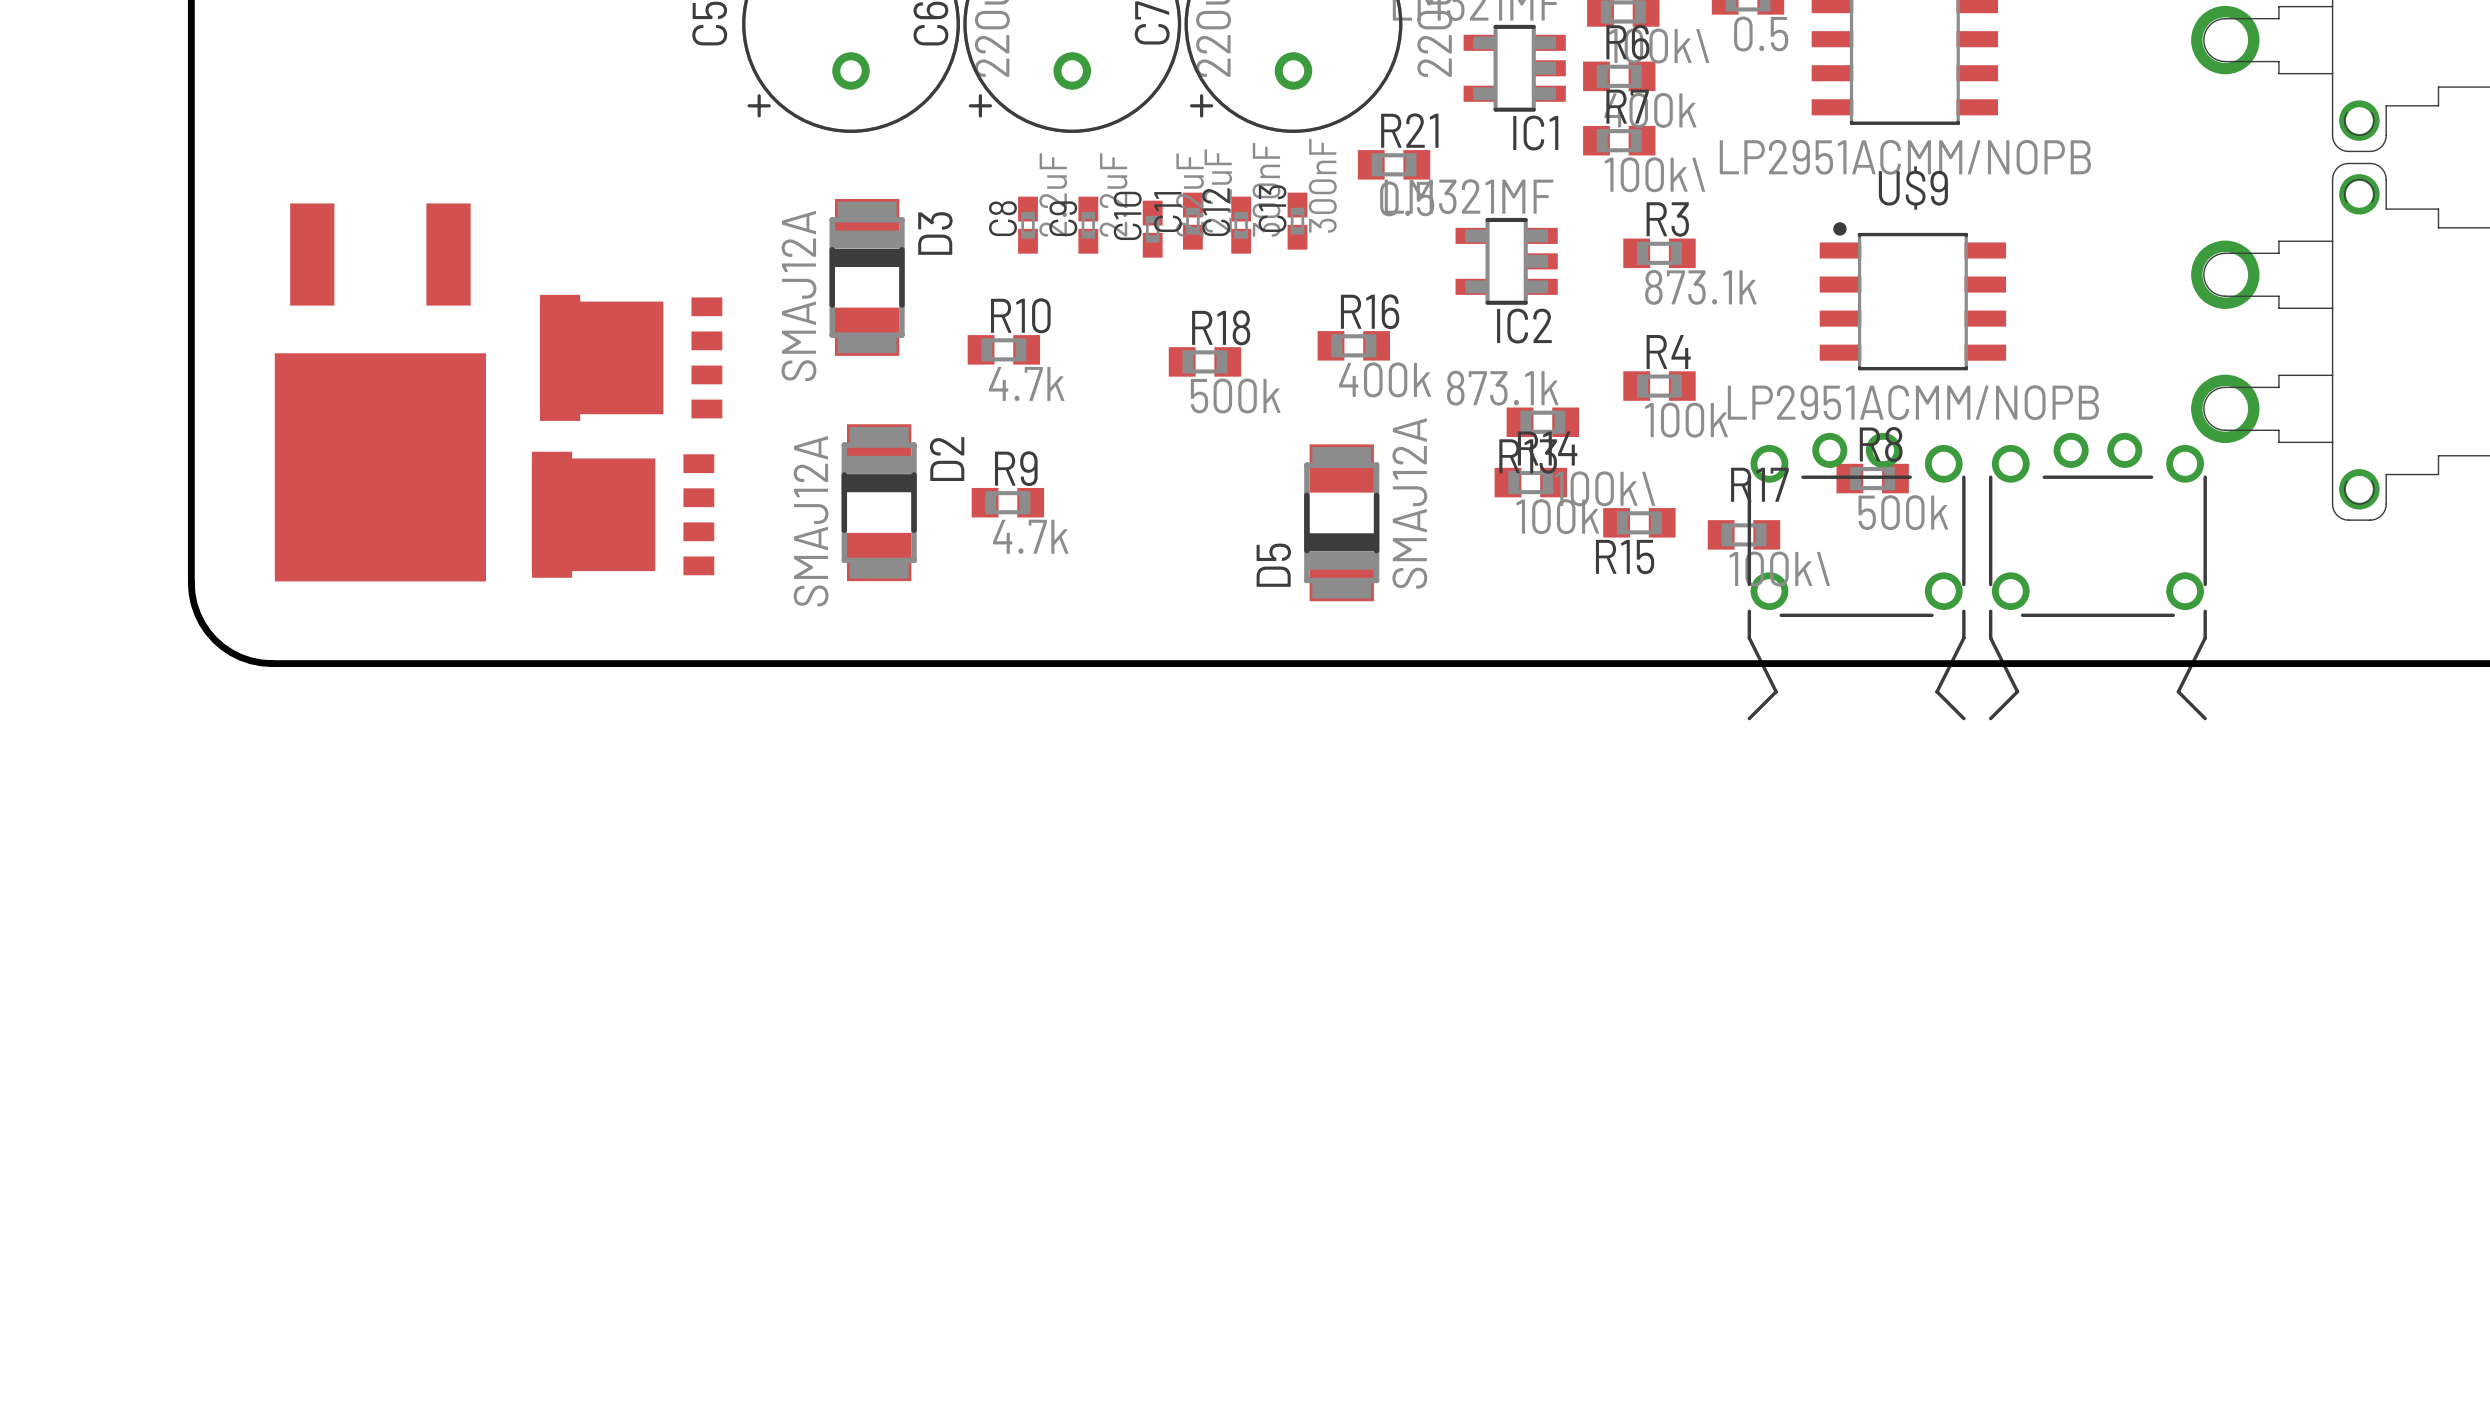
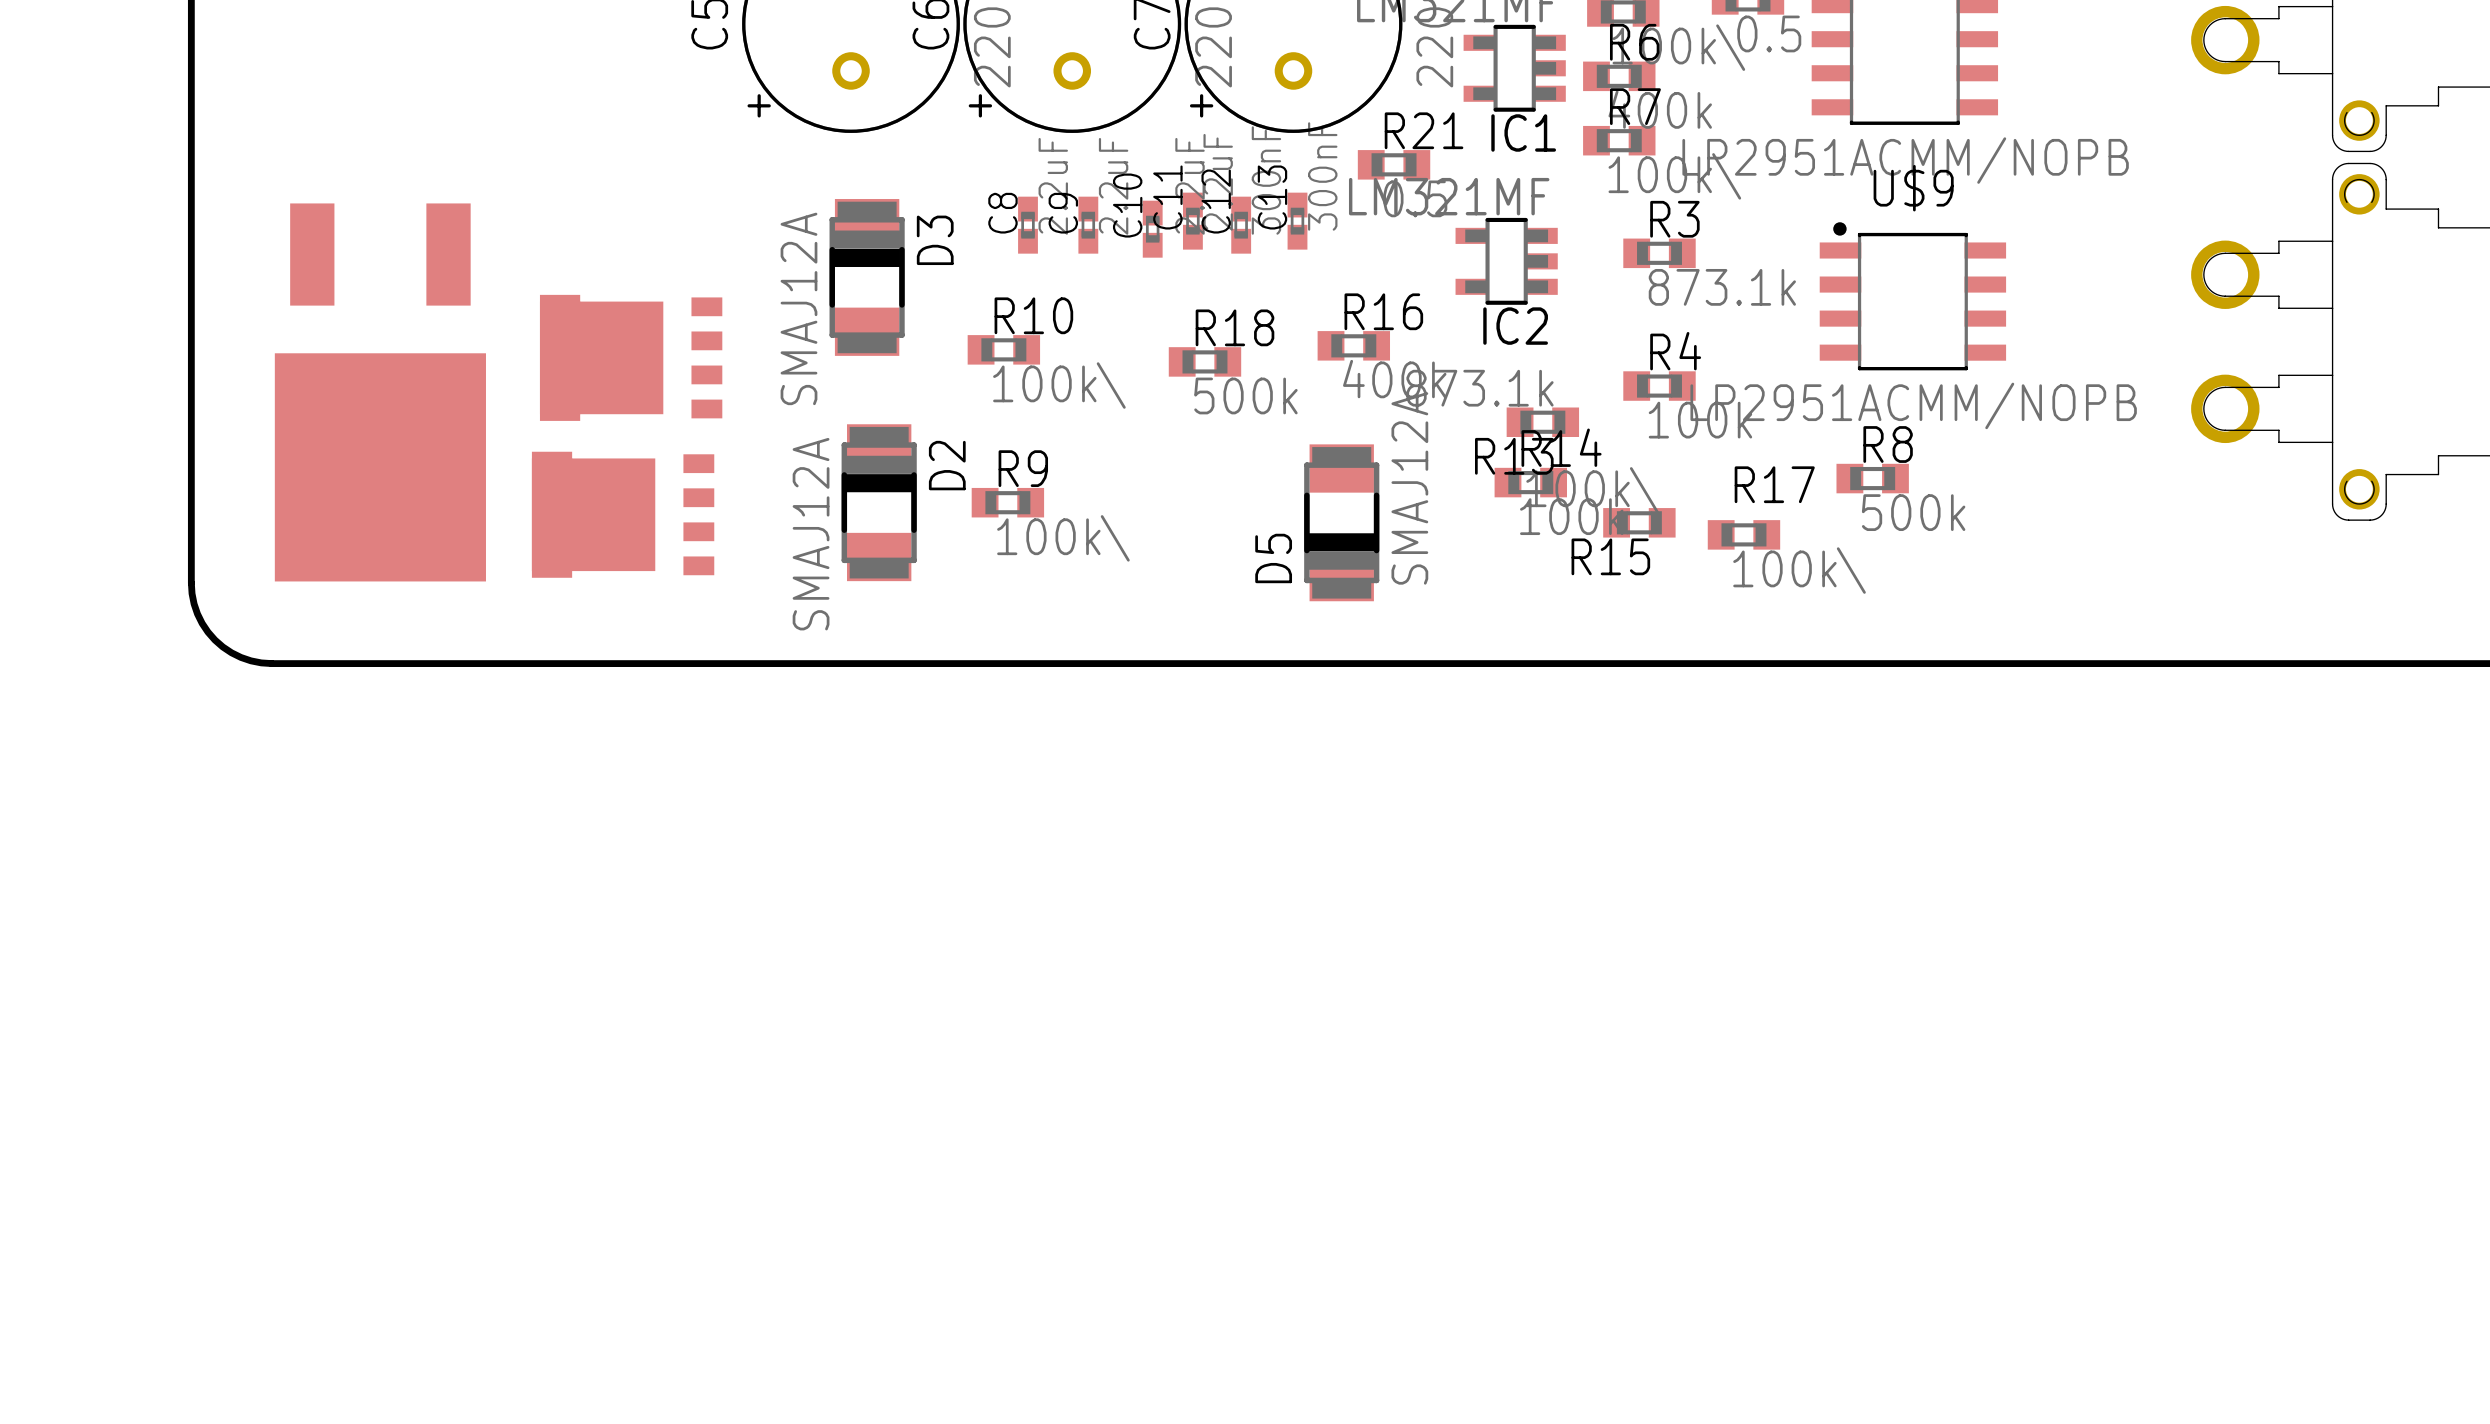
R10 value: 4.7k (1026, 383) -> 100k\ (1059, 385)
R9 value: 4.7k (1030, 536) -> 100k\ (1063, 538)
part: (1856, 576) -> none
part: (2097, 576) -> none

